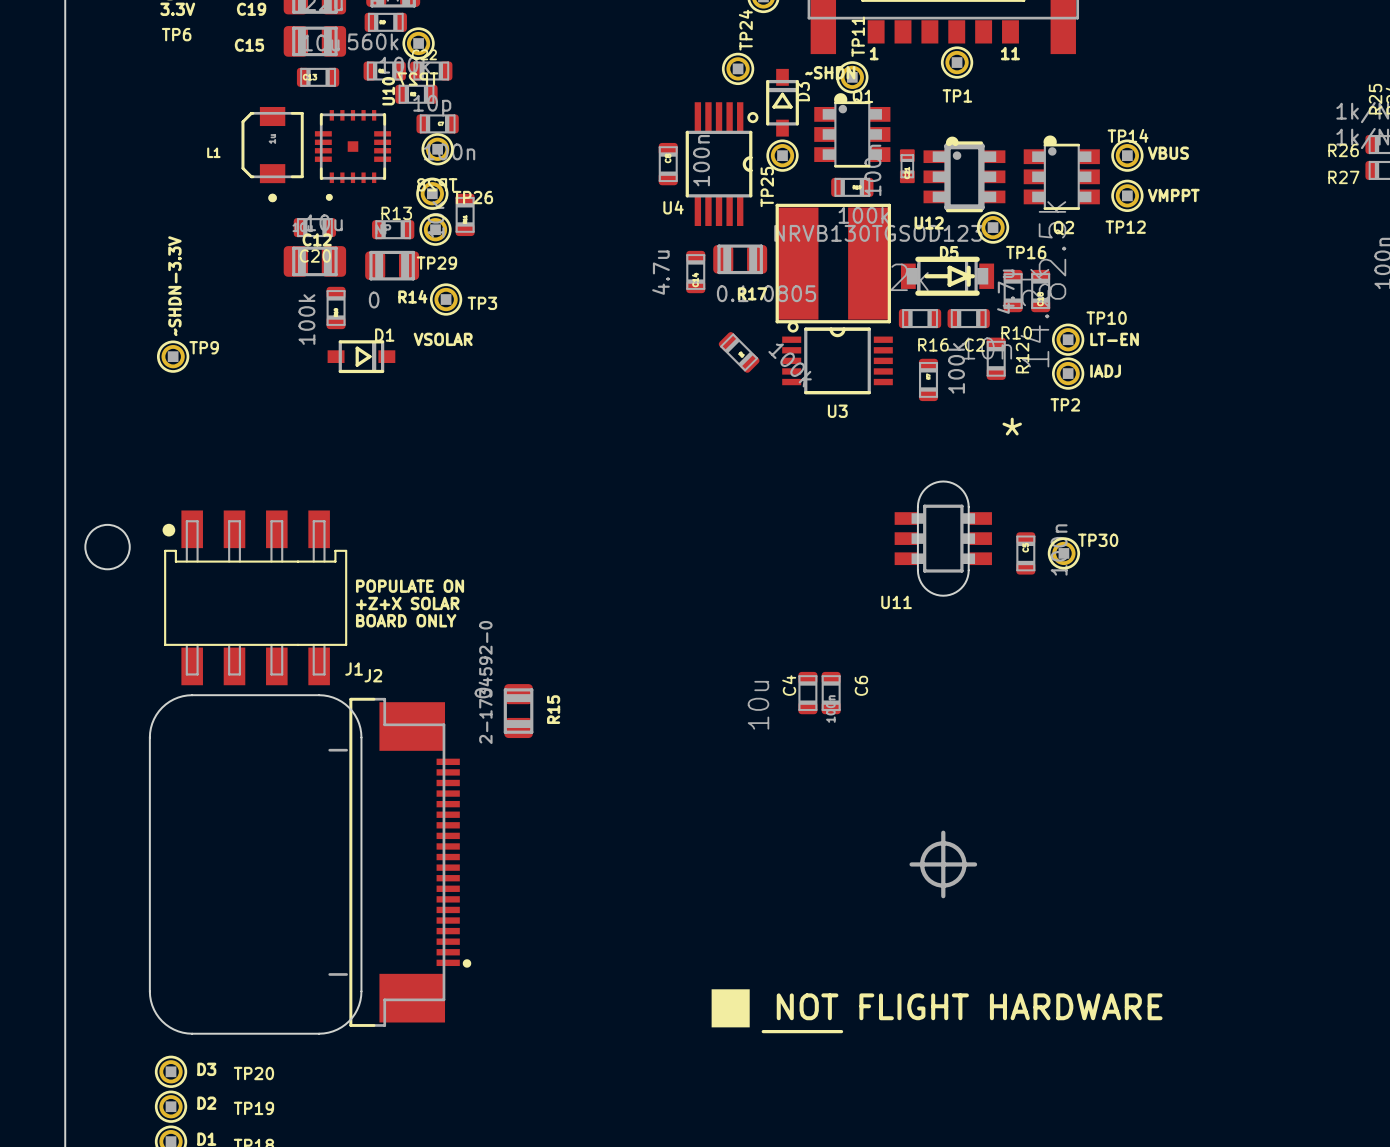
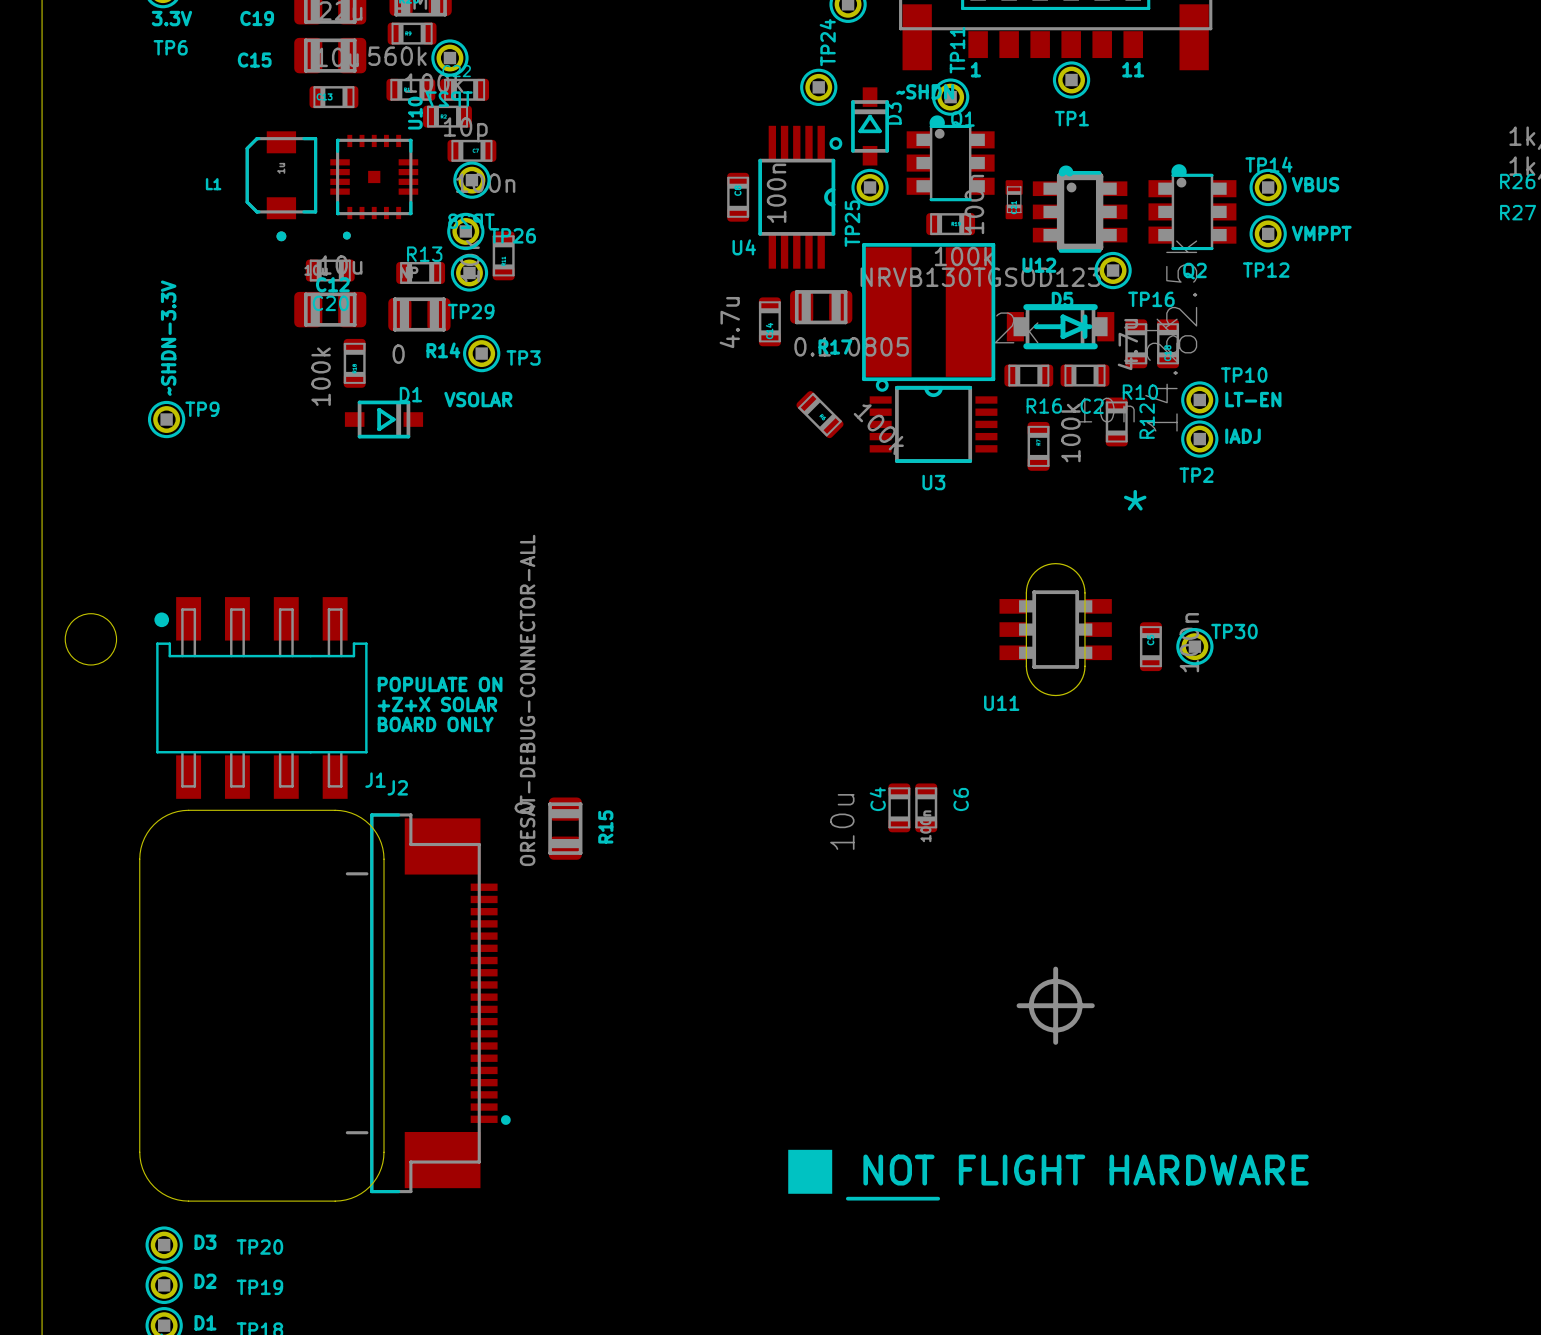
J2 value: 2-1734592-0 (485, 682) -> ORESAT-DEBUG-CONNECTOR-ALL (527, 700)

